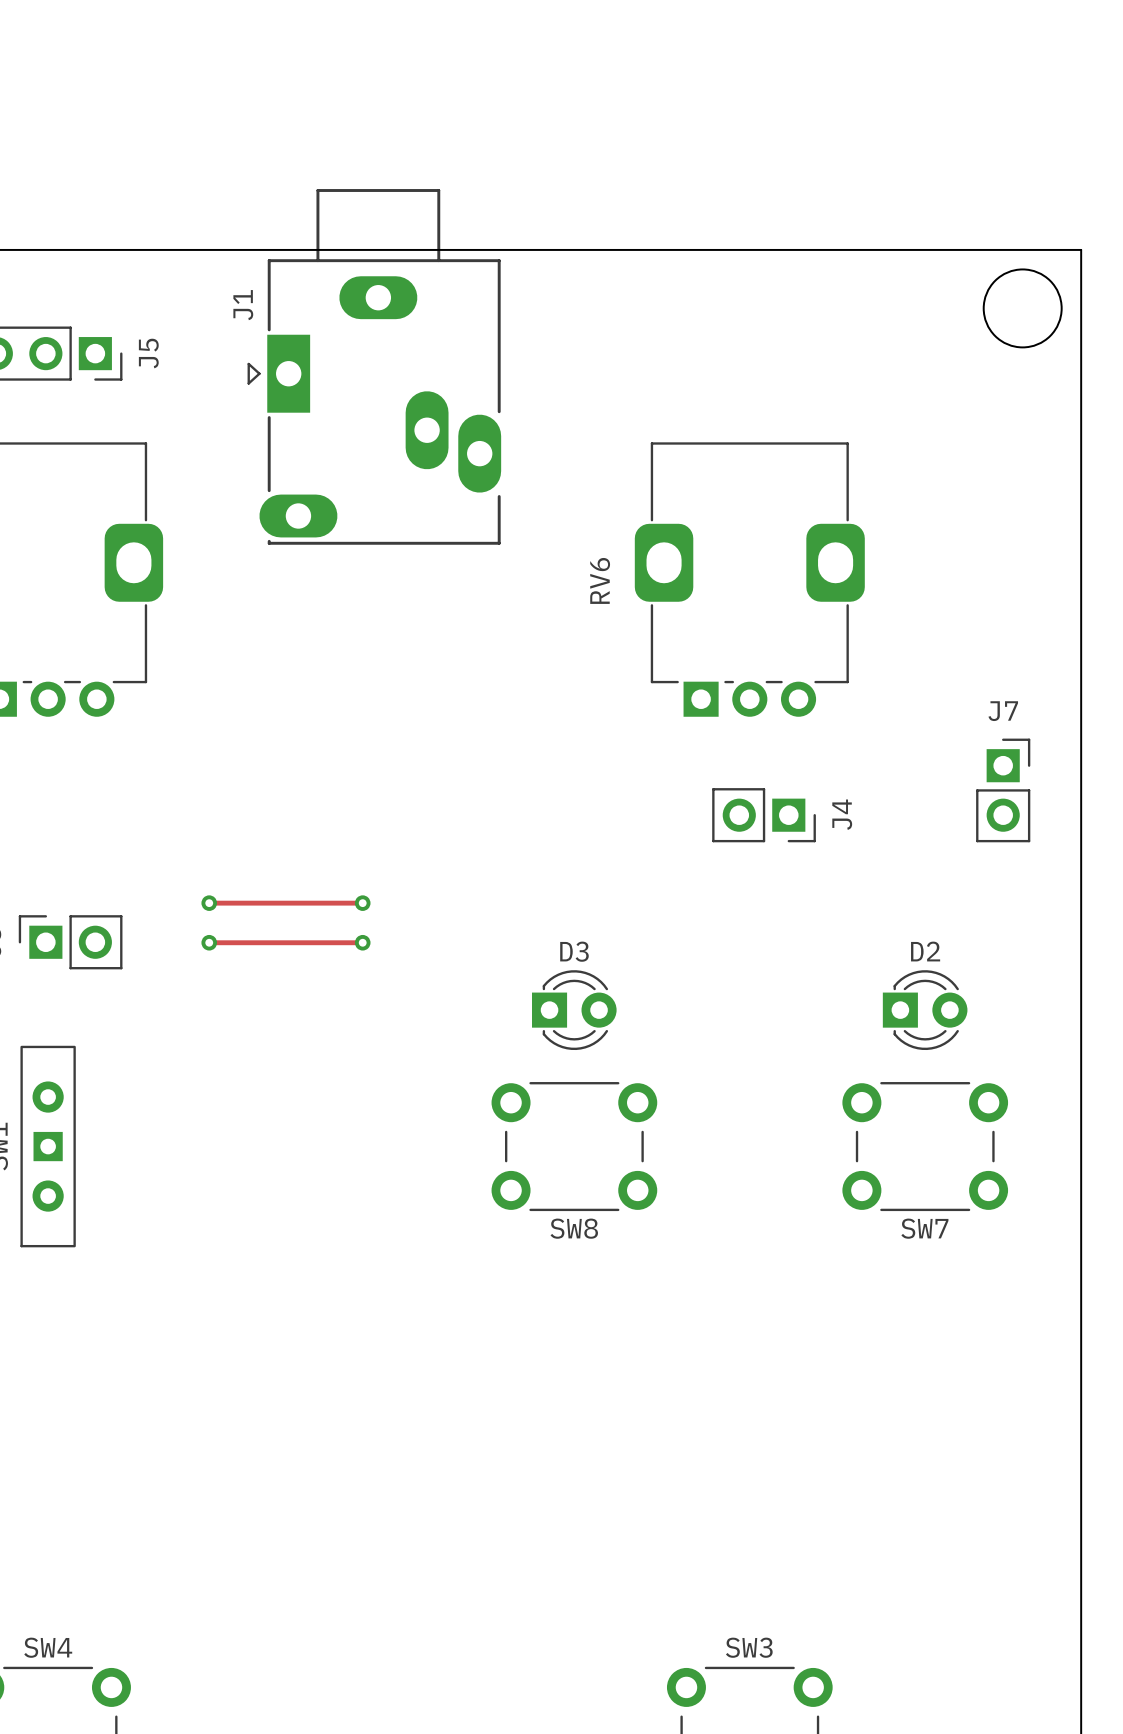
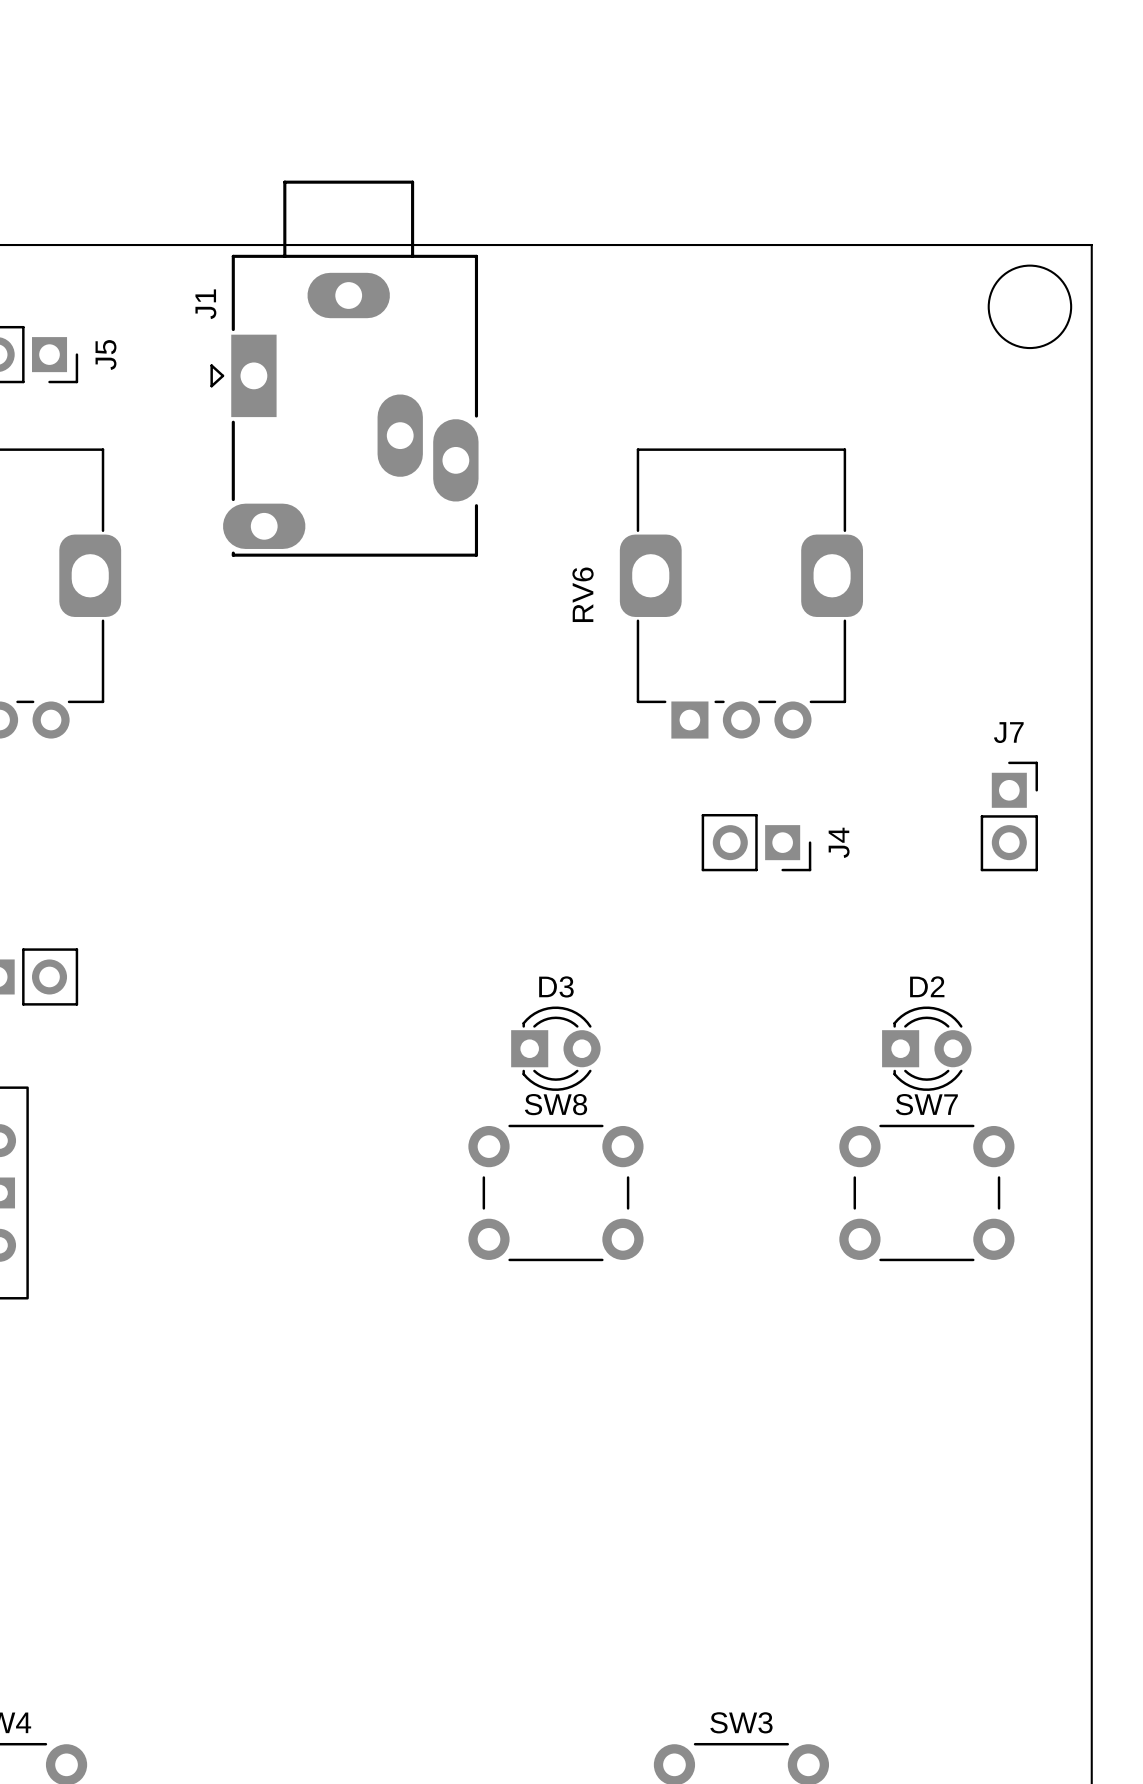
track: (209, 903) (362, 903) -> none
via: (209, 903) -> none
via: (362, 903) -> none
track: (209, 942) (362, 942) -> none
via: (209, 942) -> none
via: (362, 942) -> none
SW8 name position: SW8 (574, 1228) -> SW8 (555, 1104)
SW7 name position: SW7 (924, 1228) -> SW7 (926, 1104)

